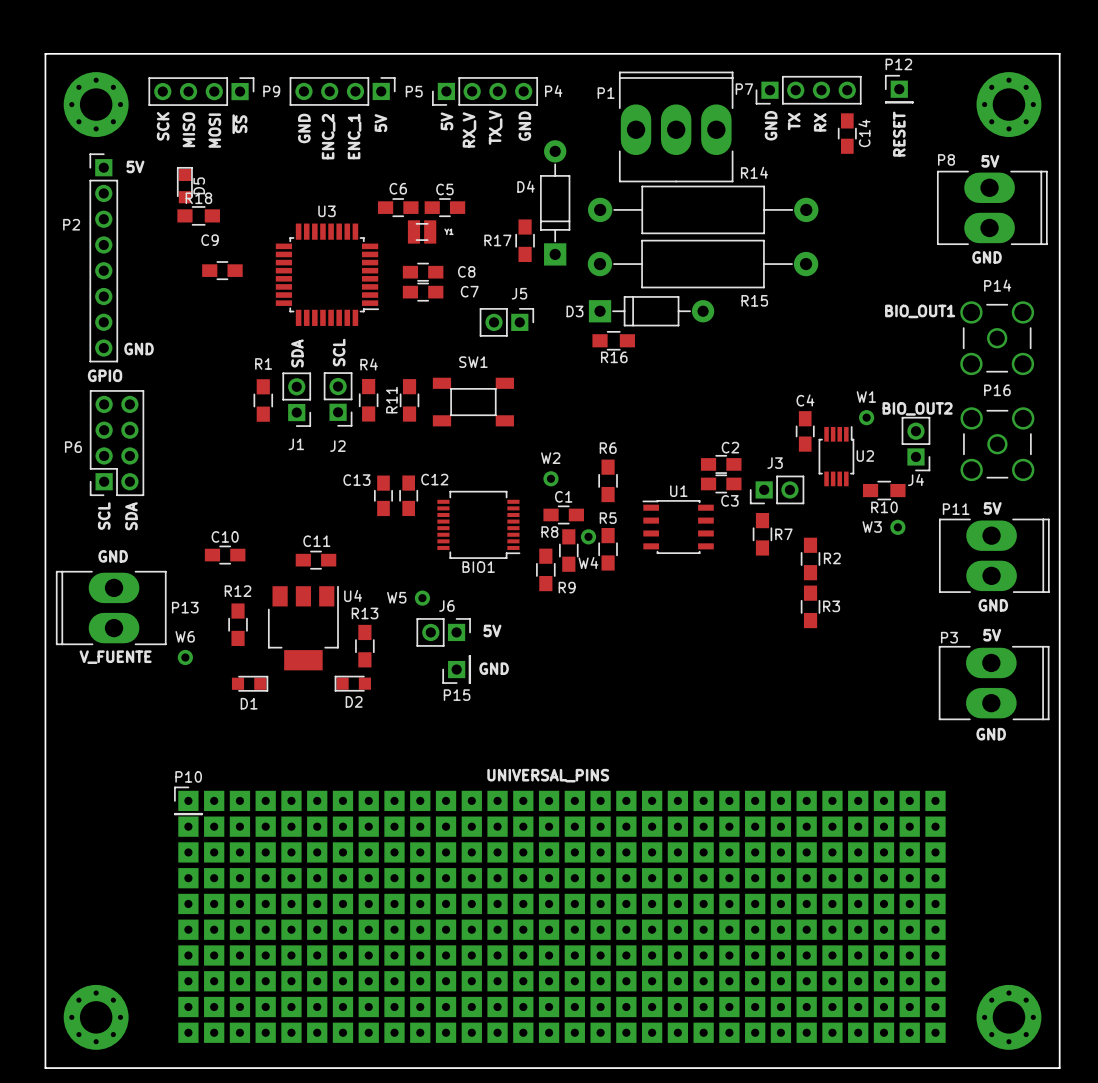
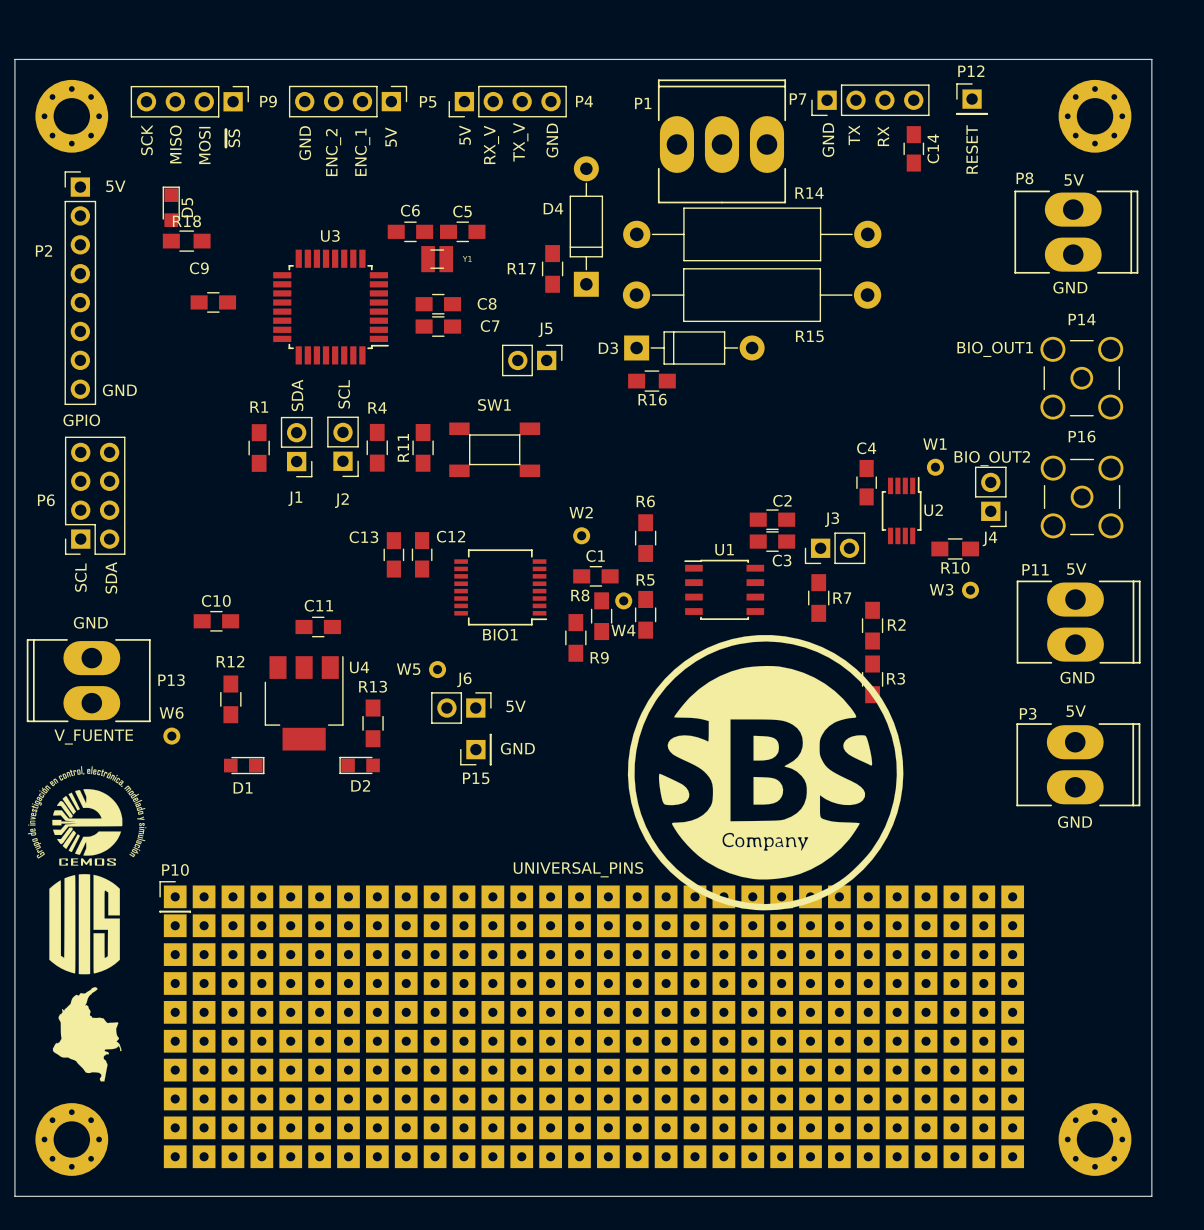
drawing: none -> [627, 635, 904, 911]
drawing: none -> [27, 766, 147, 1082]

